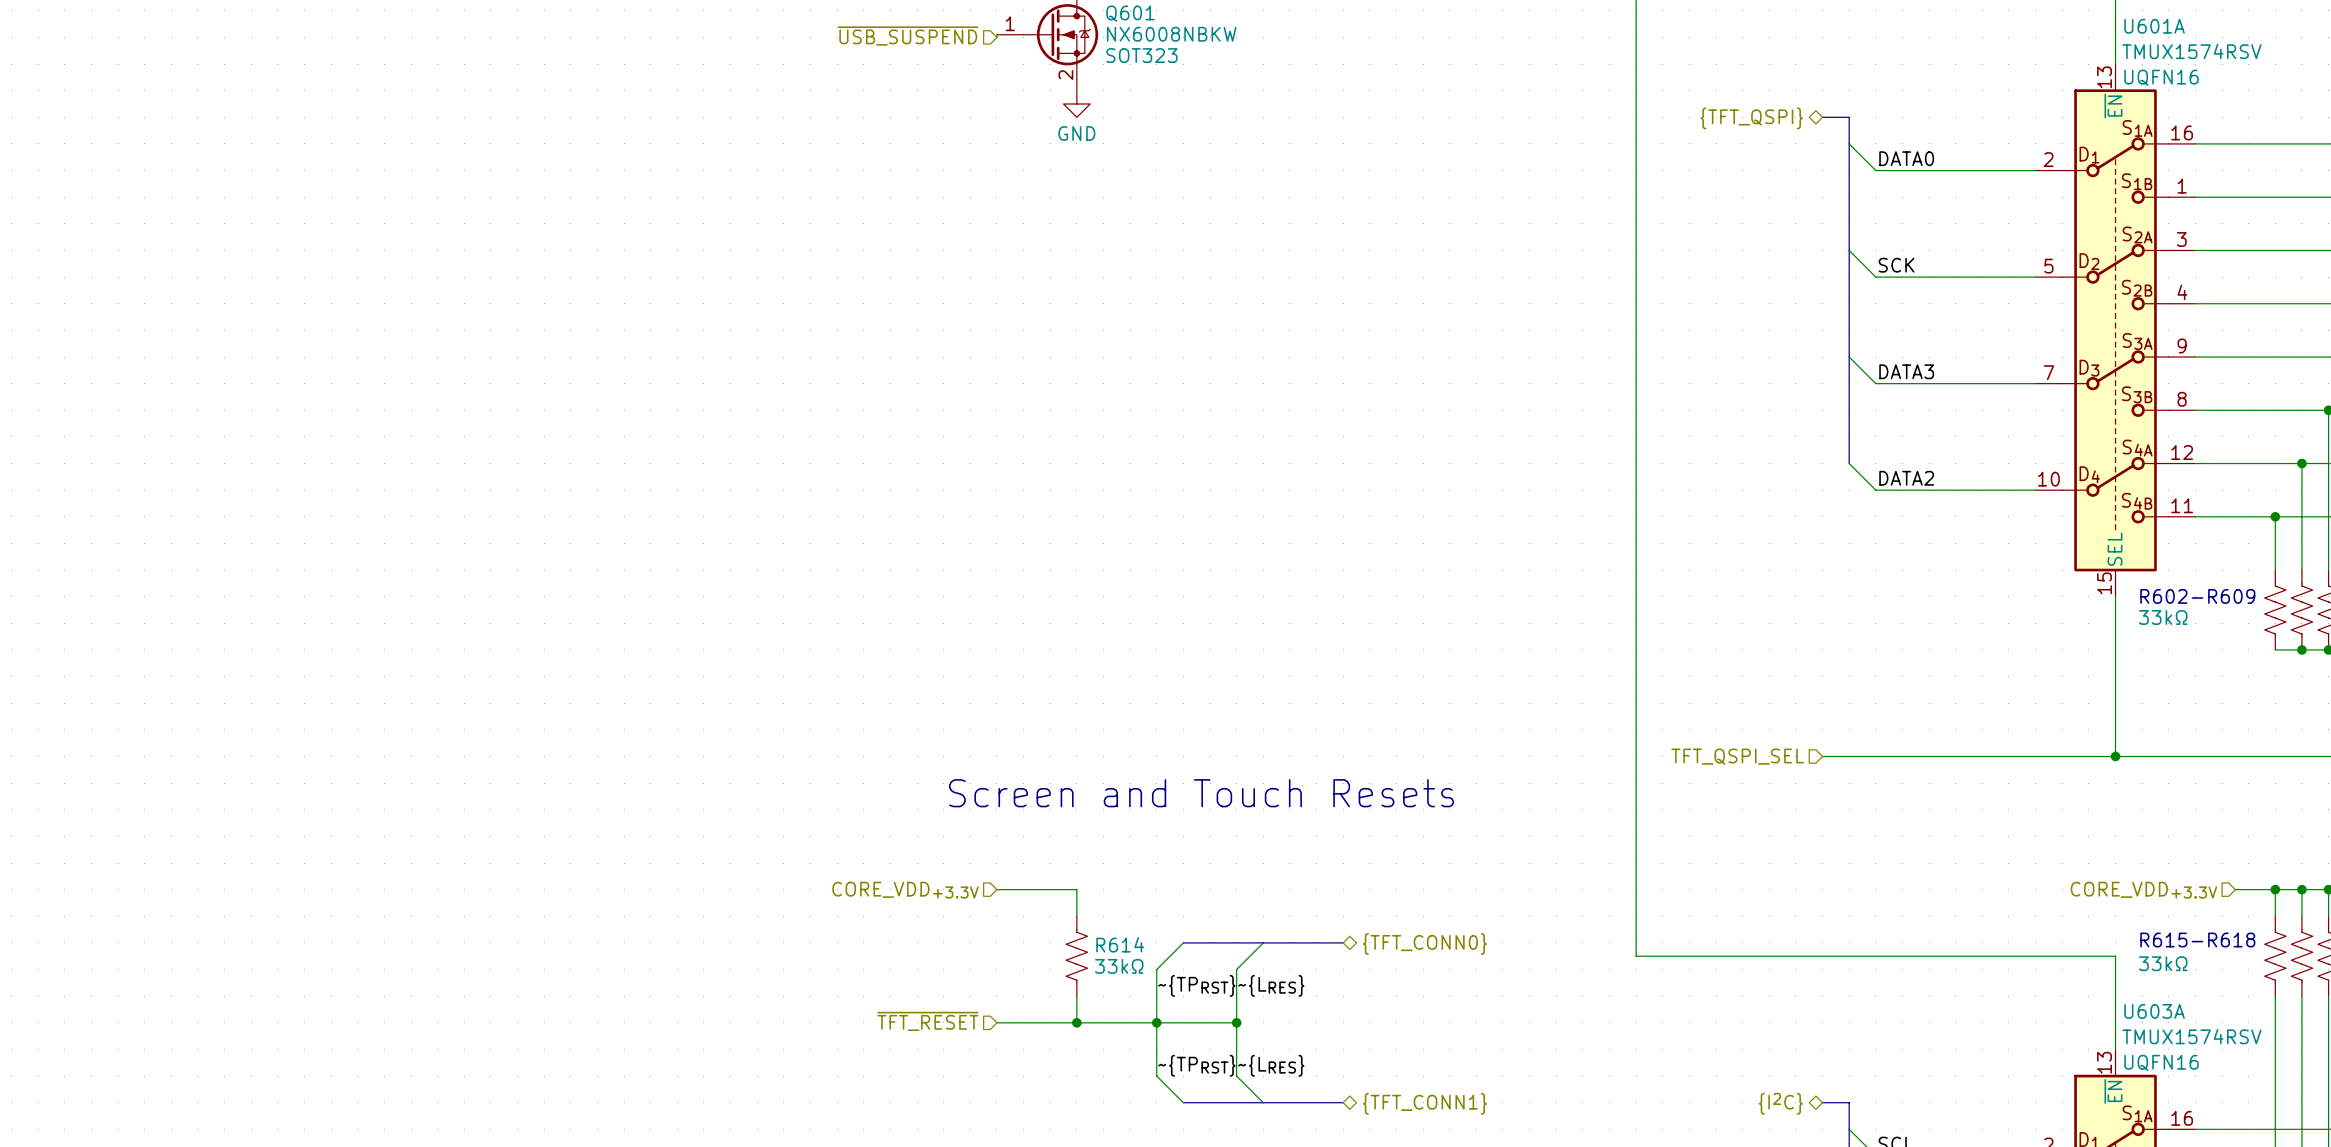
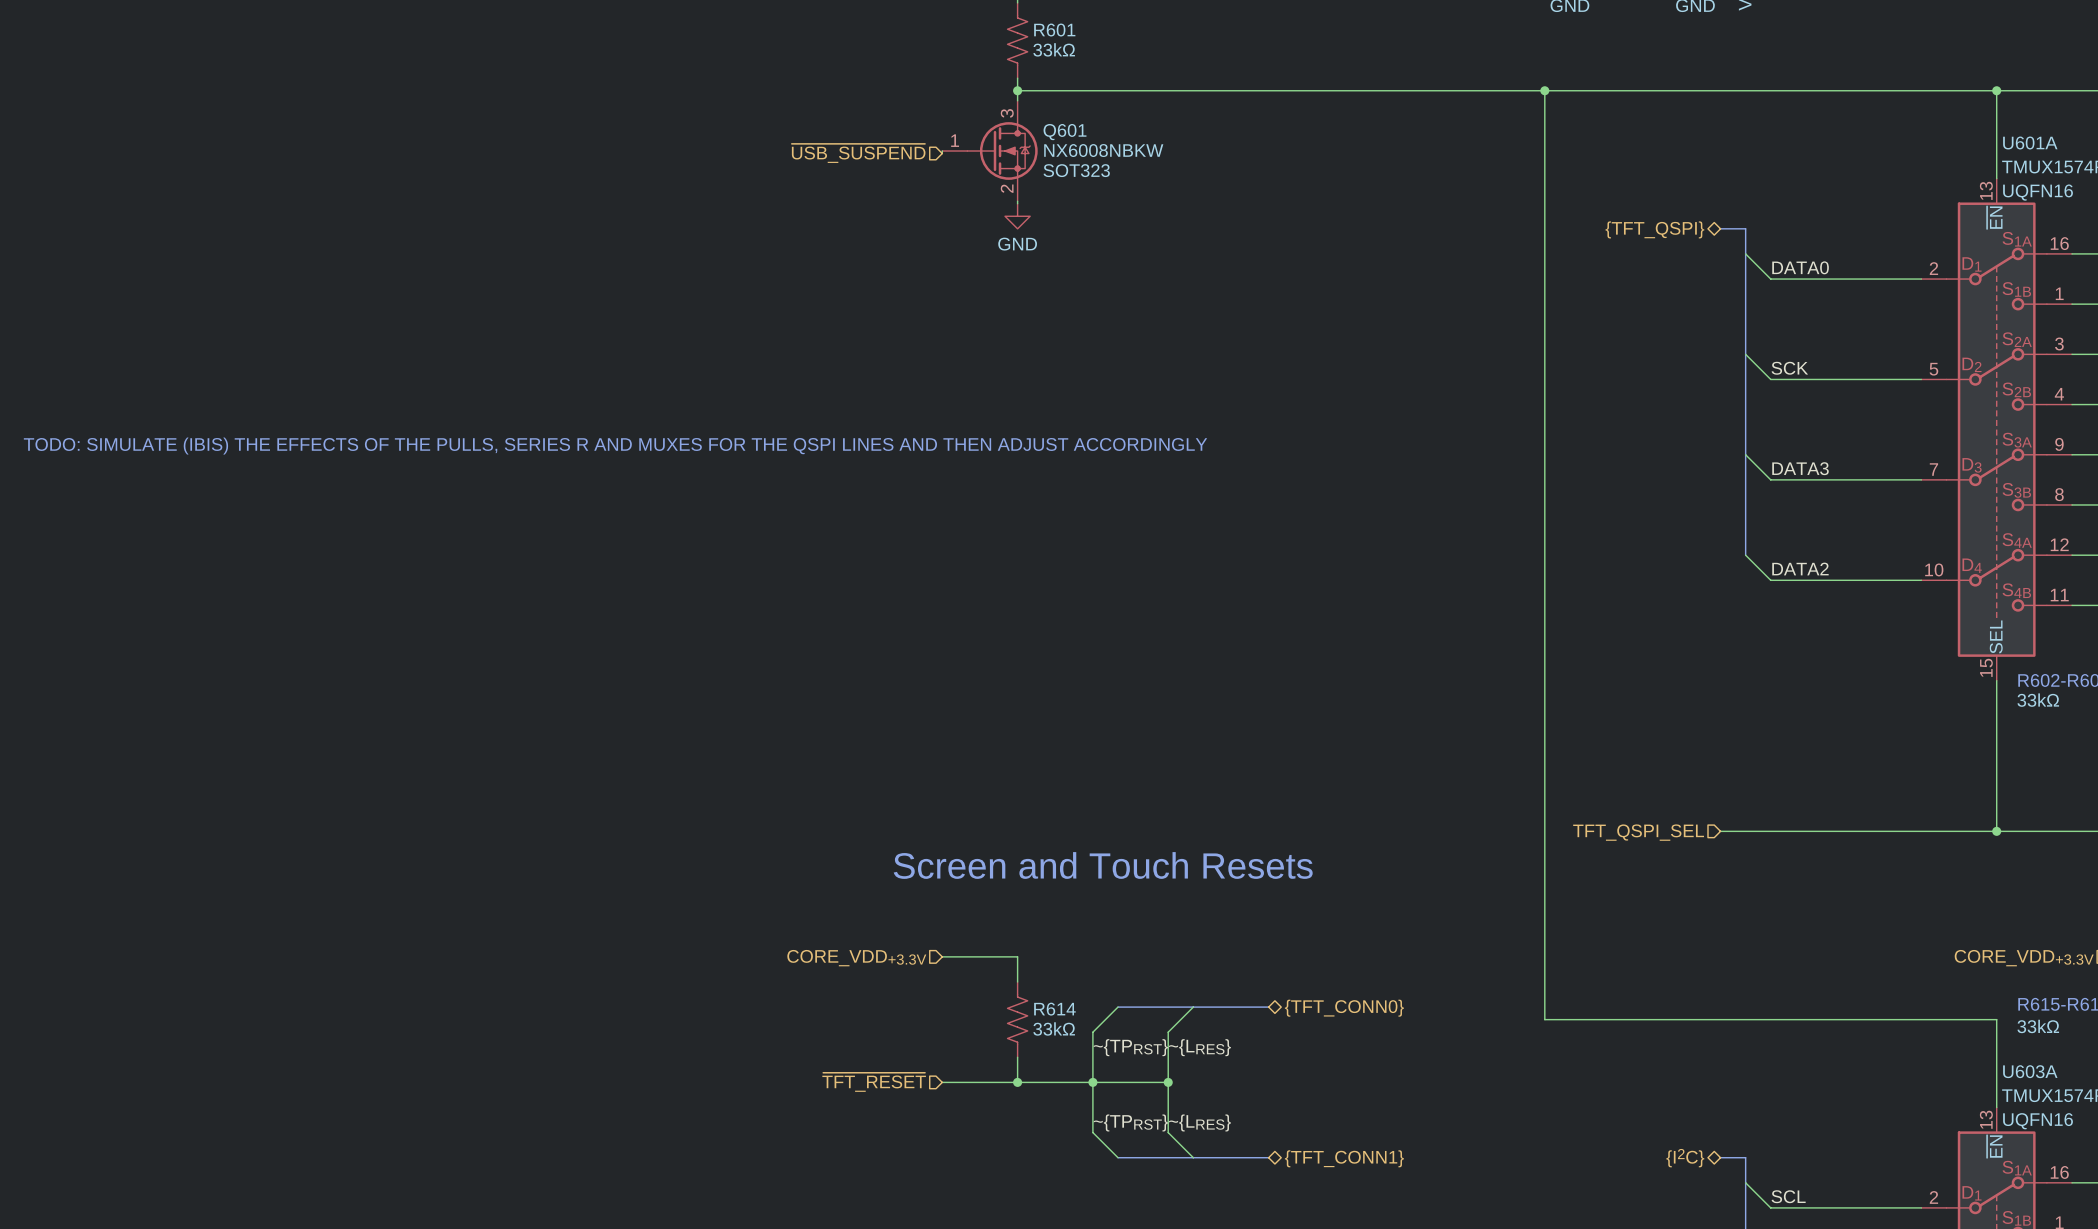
text: none -> TODO: SIMULATE (IBIS) THE EFFECTS OF THE PULLS, SERIES R AND MUXES FOR THE QSPI LINES AND THEN ADJUST ACCORDINGLY (615, 446)

